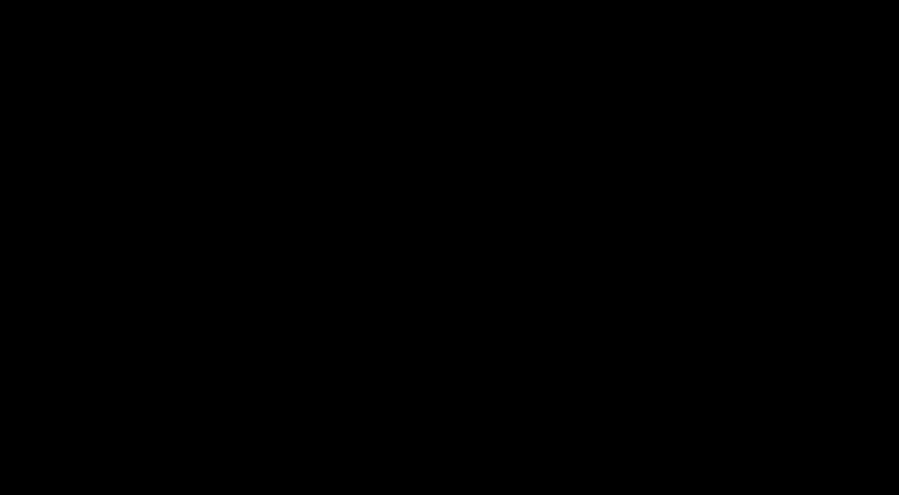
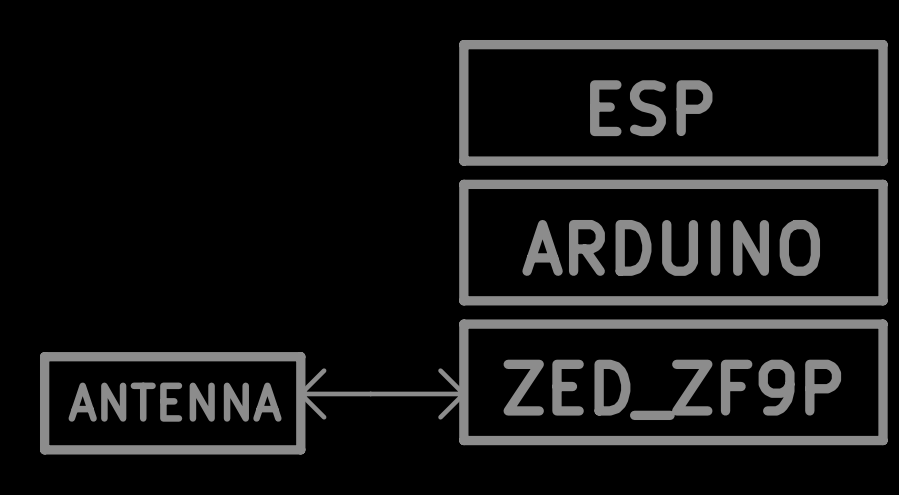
line: none -> (463, 44) (883, 44) (883, 161) (463, 161) (463, 44)
text: none -> ESP (651, 108)
line: none -> (463, 184) (463, 300) (883, 300) (883, 184) (463, 184)
text: none -> ARDUINO (671, 247)
line: none -> (463, 324) (463, 440) (883, 440) (883, 324) (463, 324)
line: none -> (44, 356) (300, 356) (300, 449) (44, 449) (44, 356)
line: none -> (324, 370) (300, 393)
line: none -> (440, 370) (463, 393)
text: none -> ZED_ZF9P (672, 389)
line: none -> (300, 393) (463, 393)
line: none -> (300, 393) (324, 417)
line: none -> (463, 393) (440, 417)
text: none -> ANTENNA (175, 402)

